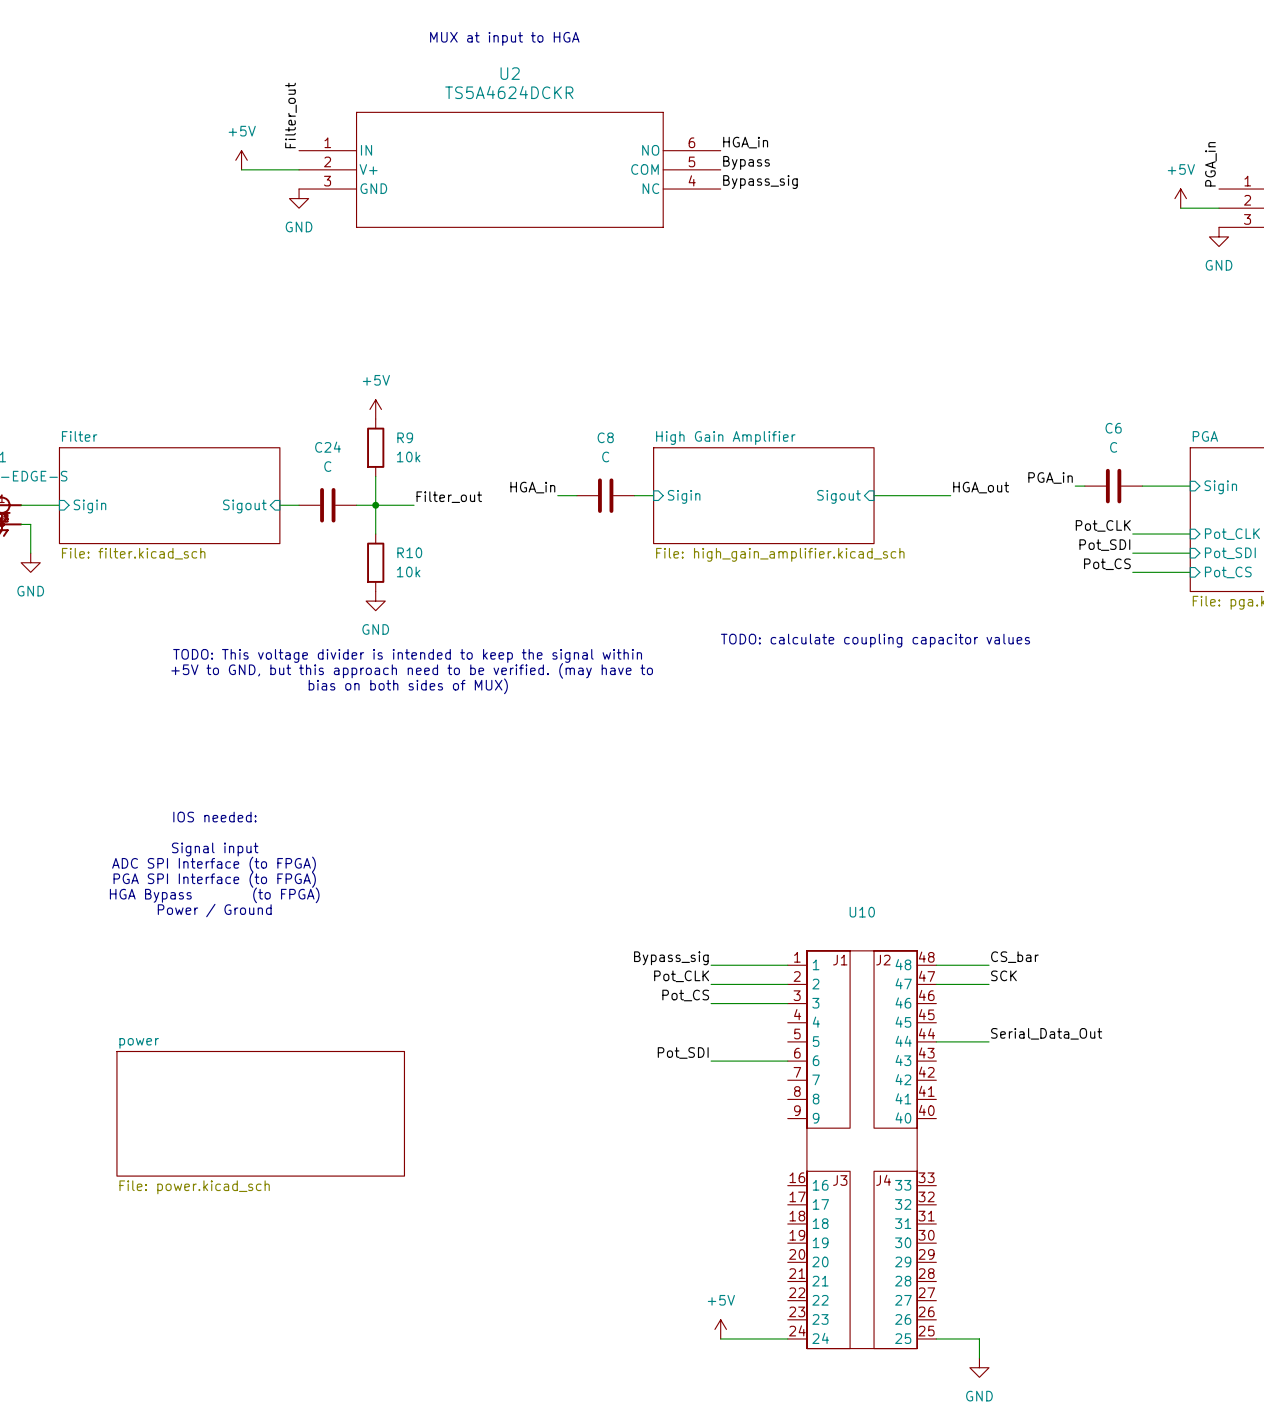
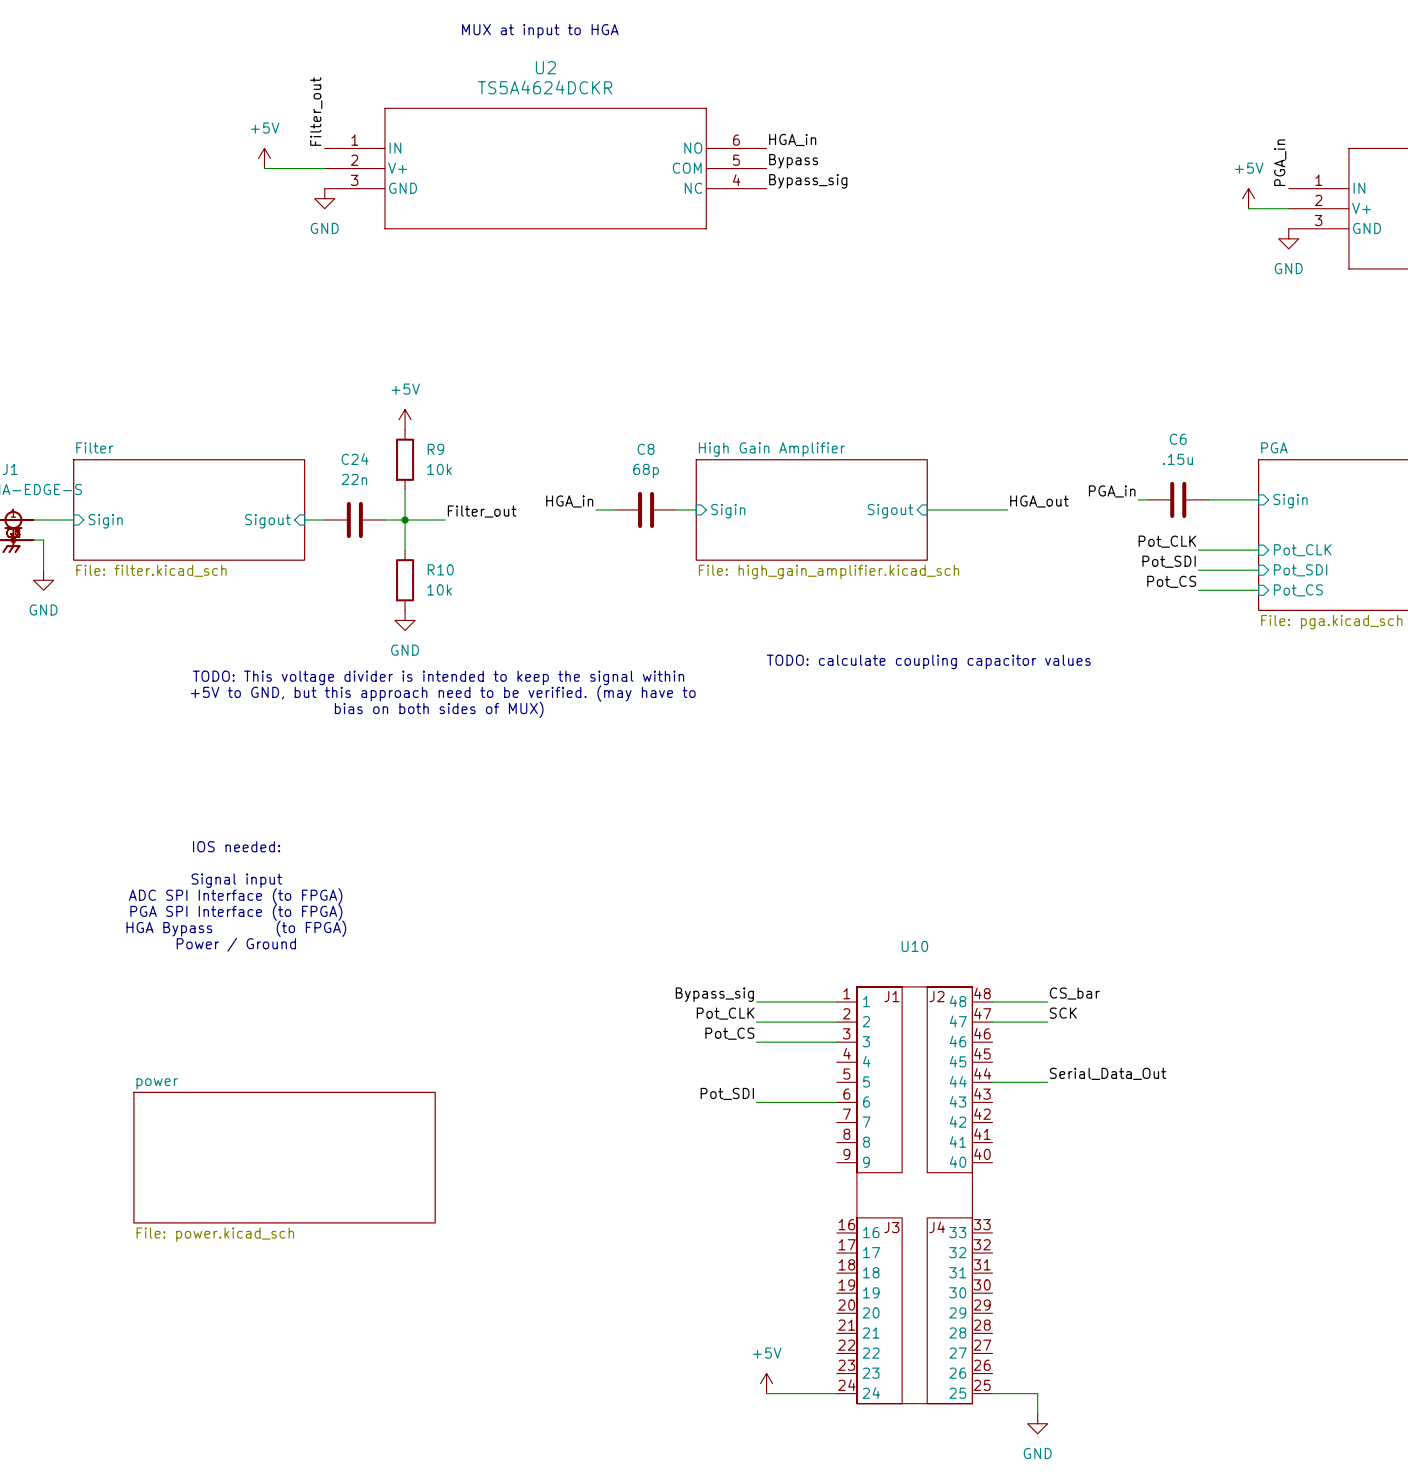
C6 value: C (1113, 447) -> .15u (1178, 459)
C8 value: C (605, 456) -> 68p (646, 471)
C24 value: C (327, 466) -> 22n (354, 479)

